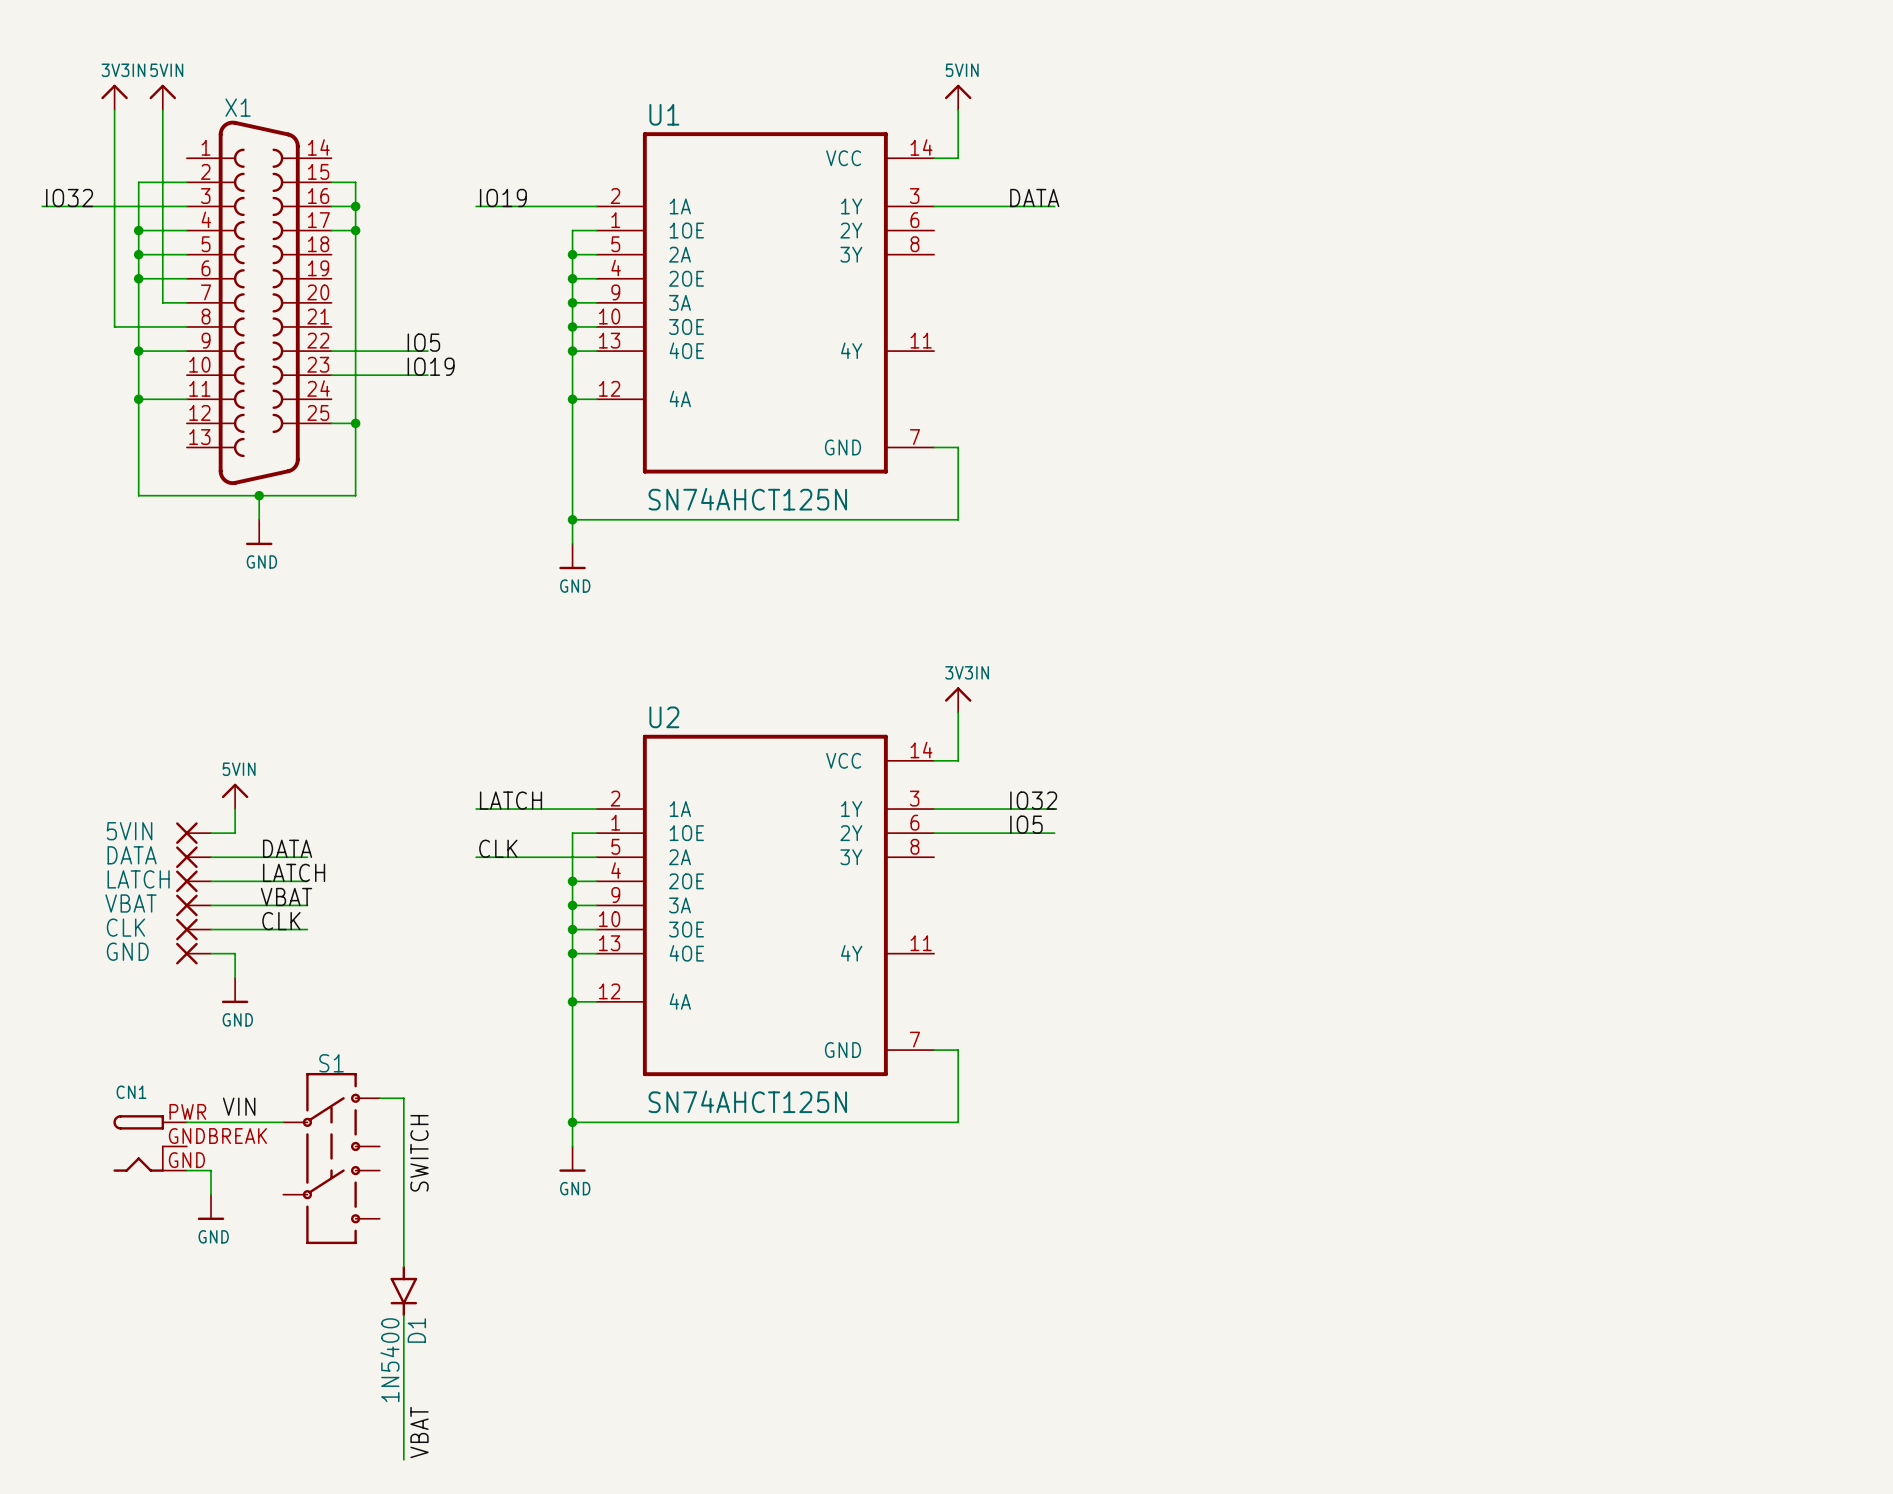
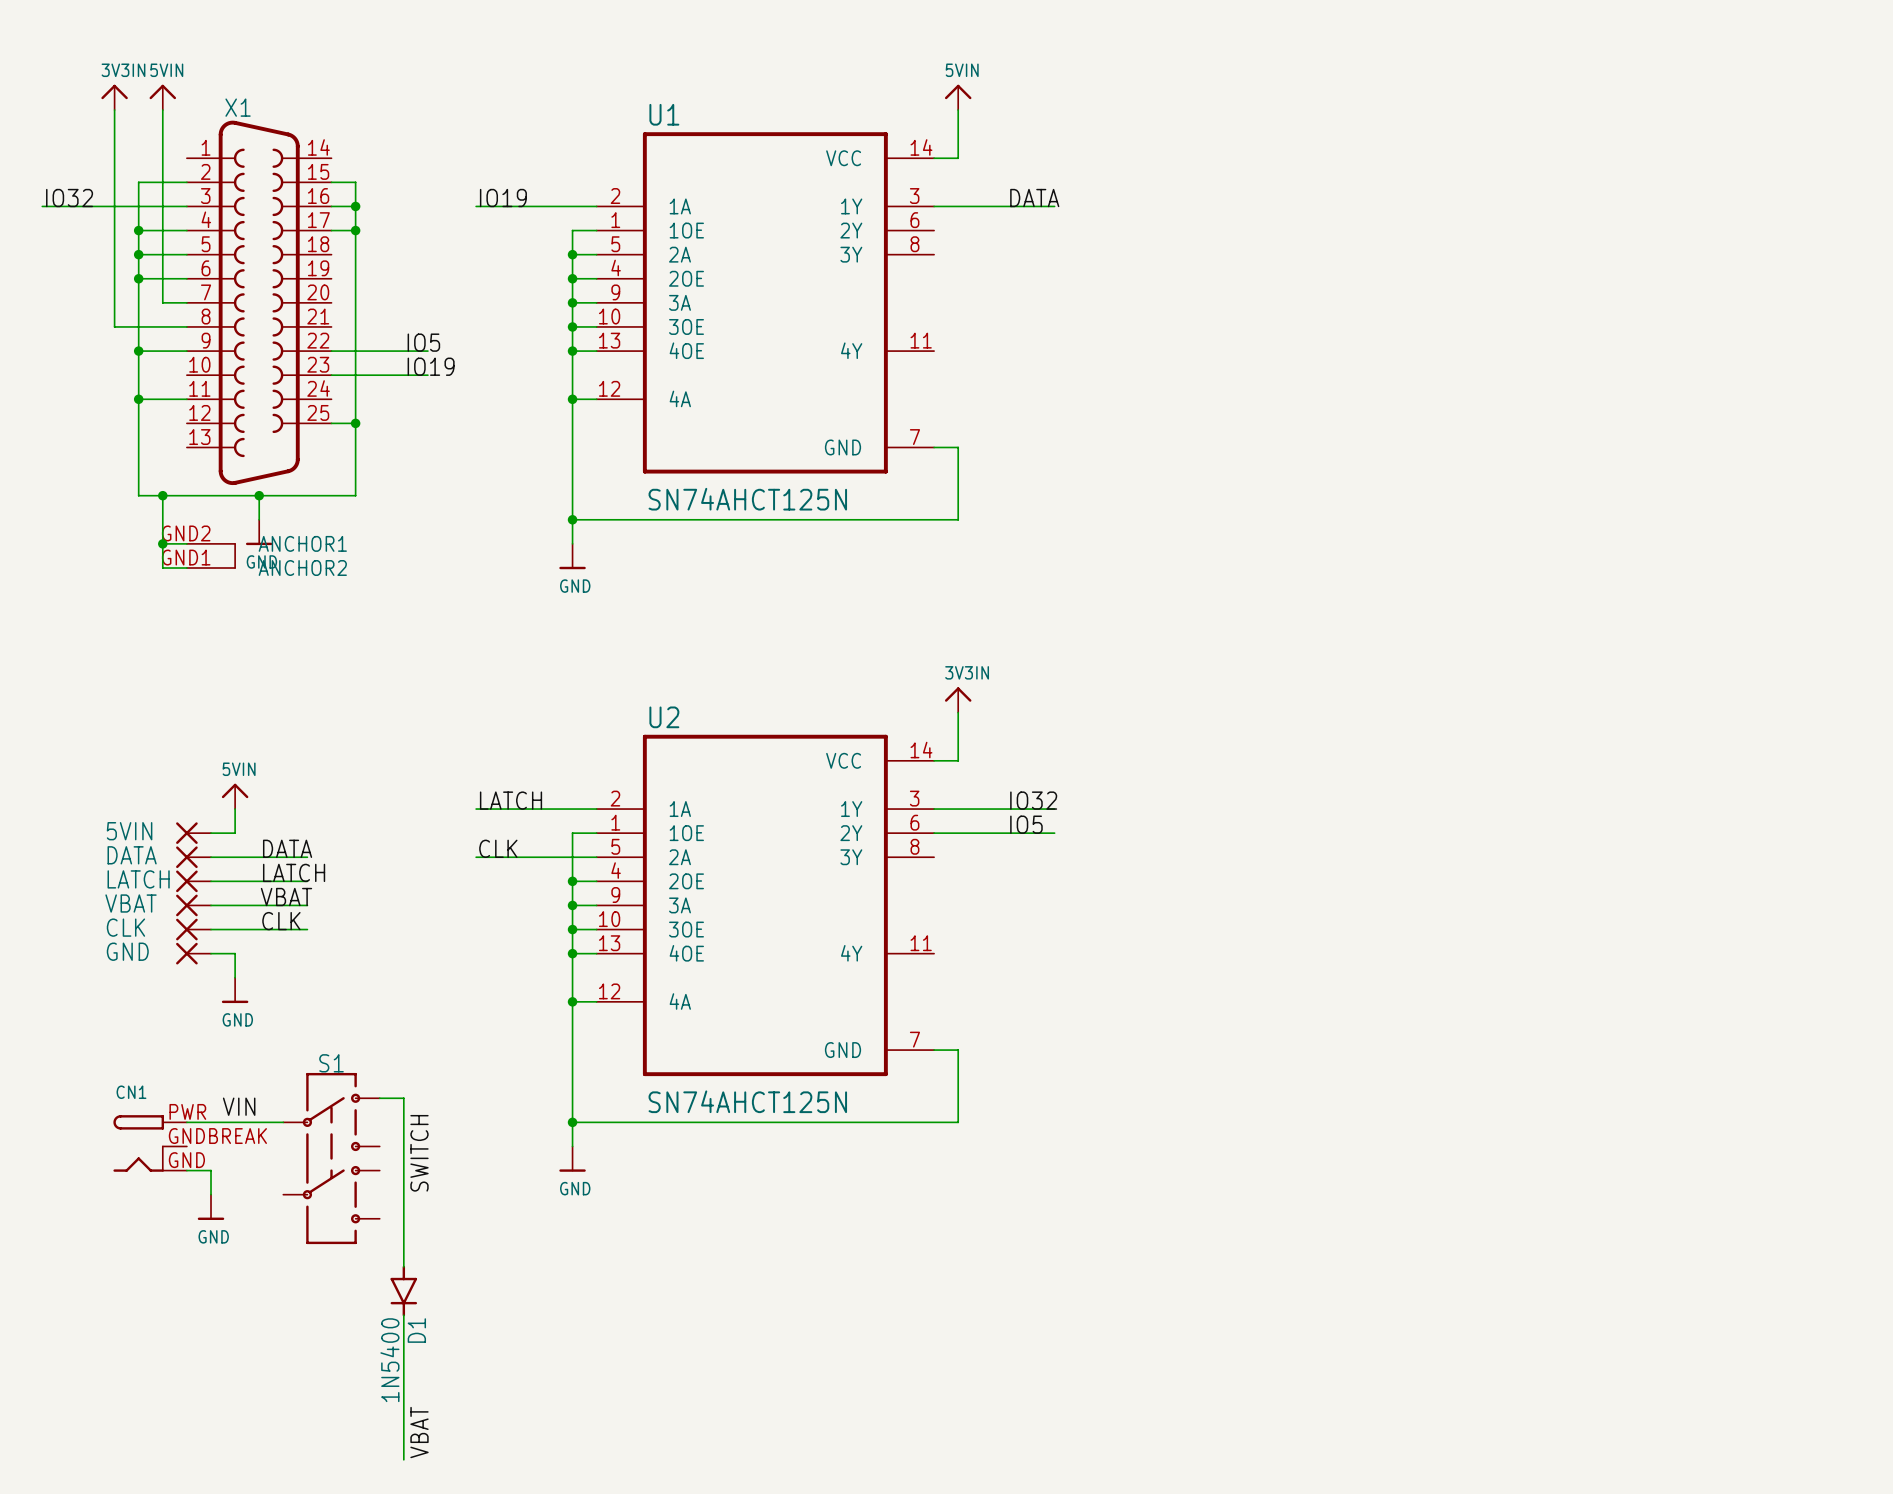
X1 symbol: [186, 120, 332, 486] -> [186, 120, 332, 569]
wire: none -> (162, 495) (162, 568) (186, 568)
junction: none -> (162, 495)
wire: none -> (162, 543) (186, 543)
junction: none -> (162, 543)

